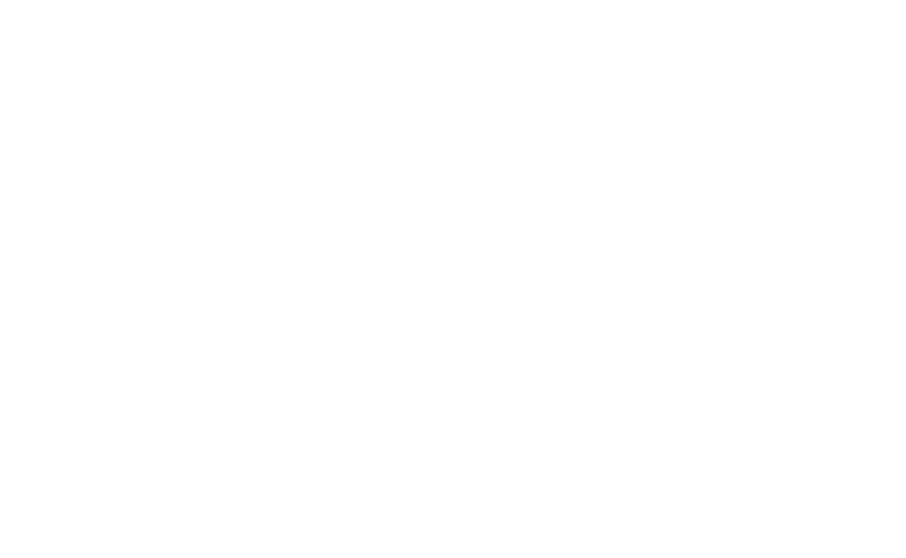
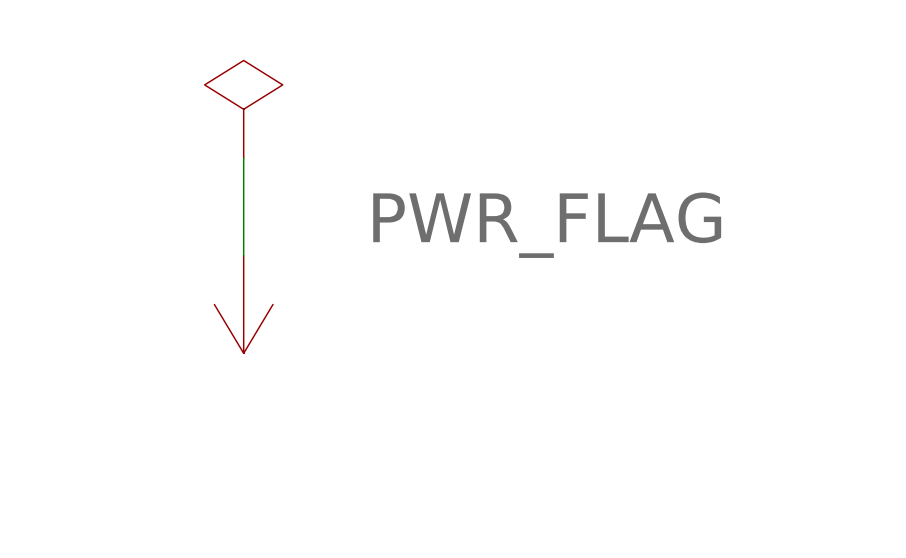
power symbol: none -> PWR_FLAG (243, 109)
wire: none -> (243, 158) (243, 255)
power symbol: none -> (243, 304)

